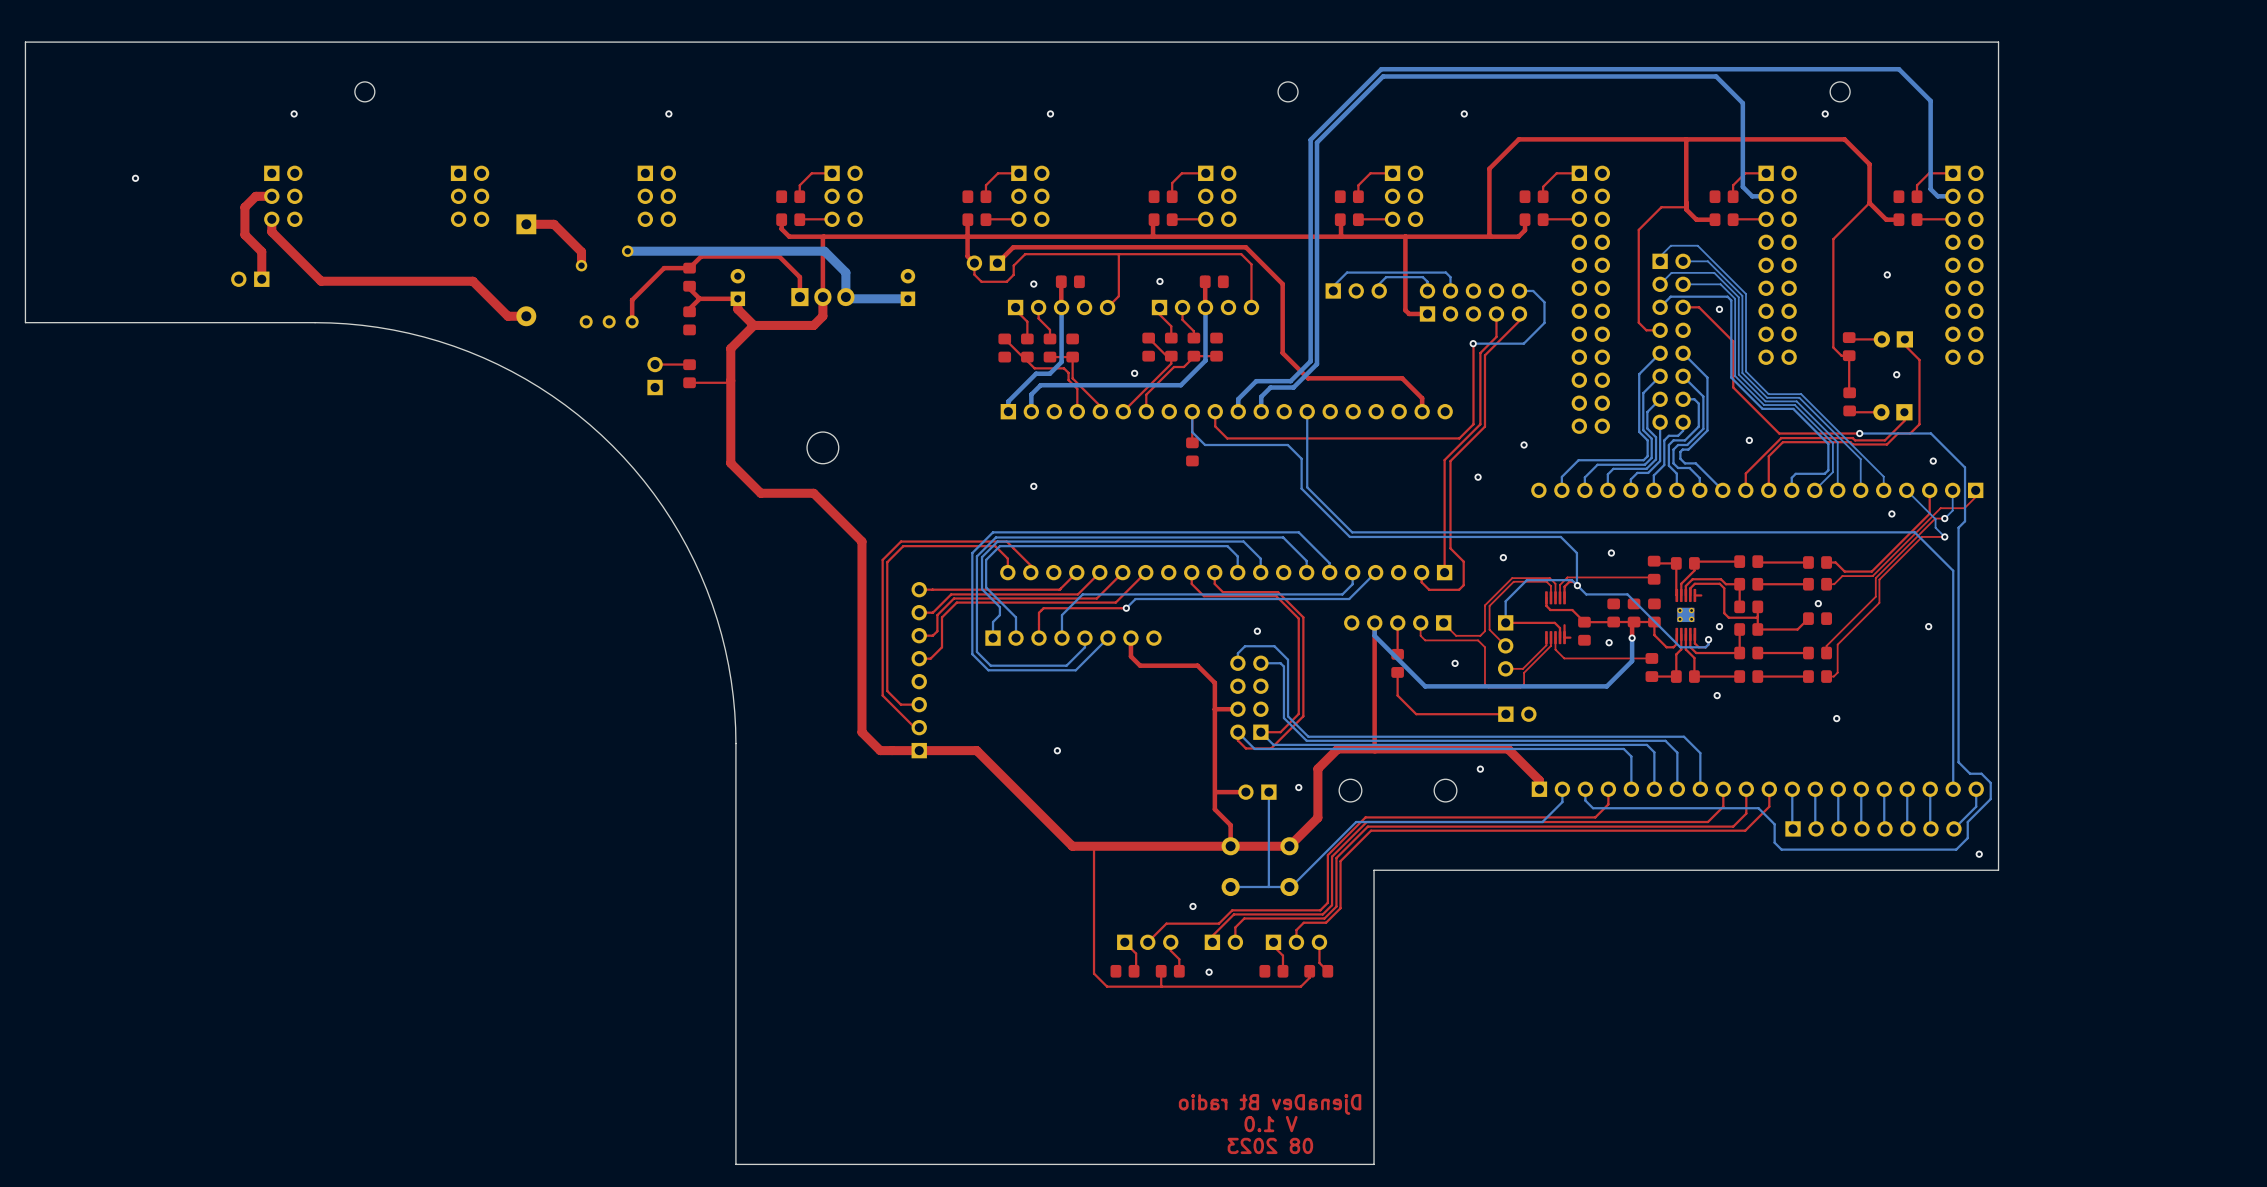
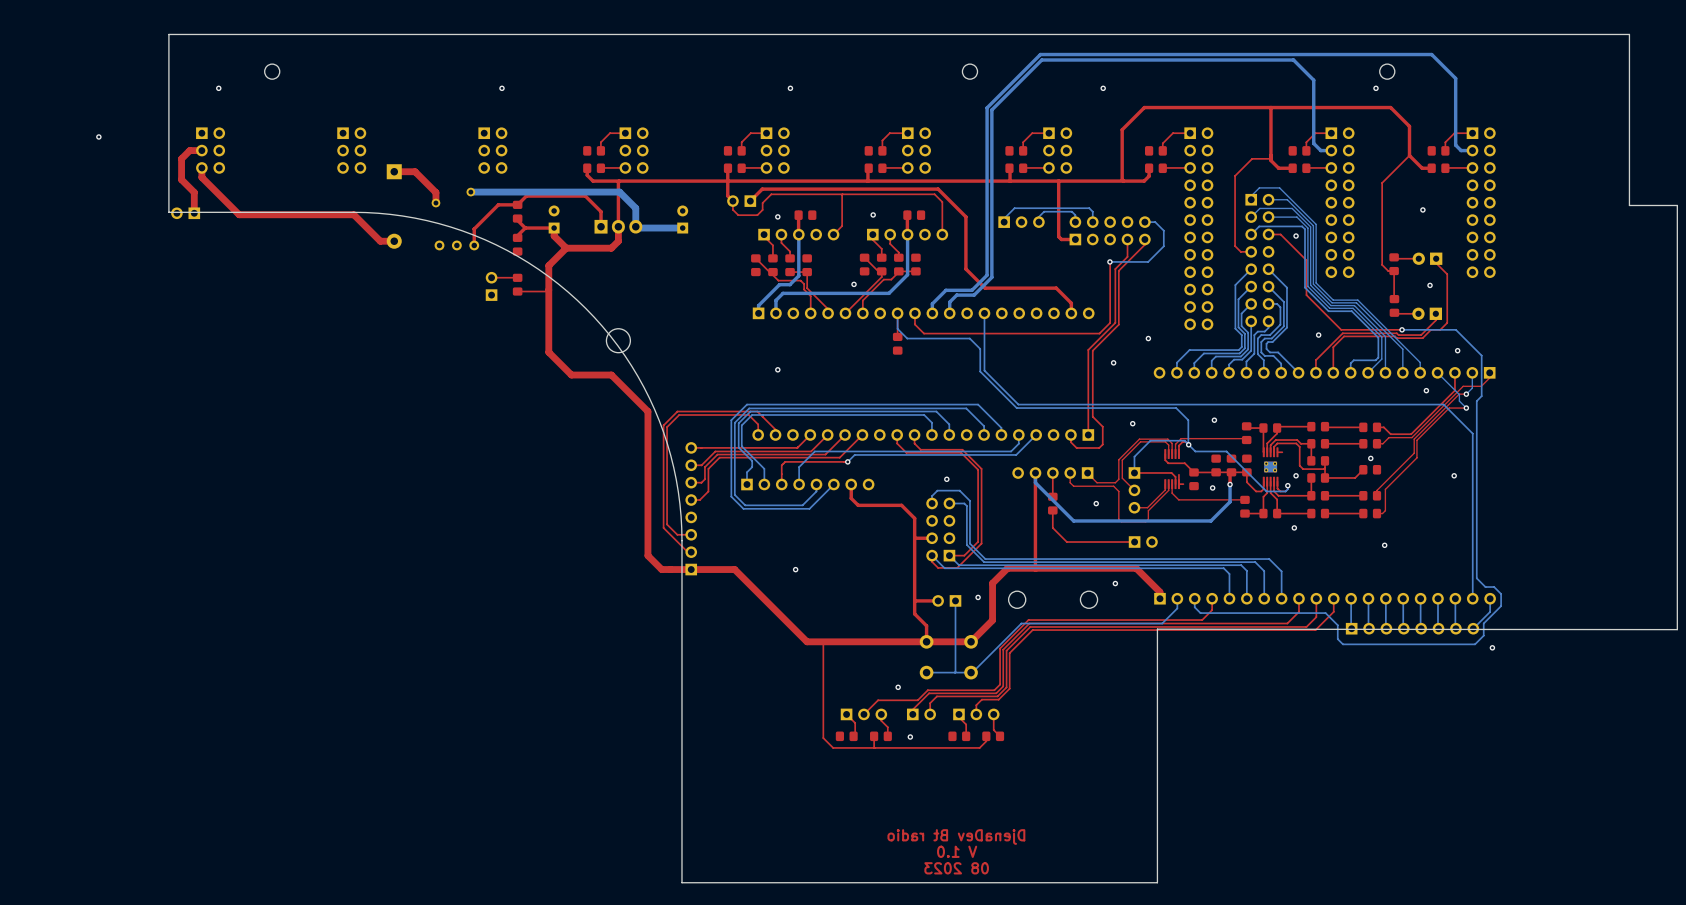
board edge: (1998, 42) (1998, 870) (1374, 870) (1374, 1164) (735, 1164) (735, 743) (731, 680) (717, 619) (700, 575) (671, 519) (634, 469) (589, 424) (538, 387) (511, 371) (468, 351) (408, 333) (377, 327) (330, 322) (25, 322) (25, 42) (1998, 42) -> (1629, 34) (1629, 205) (1677, 205) (1677, 629) (1157, 629) (1157, 882) (681, 882) (681, 540) (679, 503) (670, 455) (659, 420) (637, 376) (617, 345) (576, 299) (538, 269) (496, 244) (450, 226) (402, 215) (365, 212) (168, 212) (168, 34) (1629, 34)

